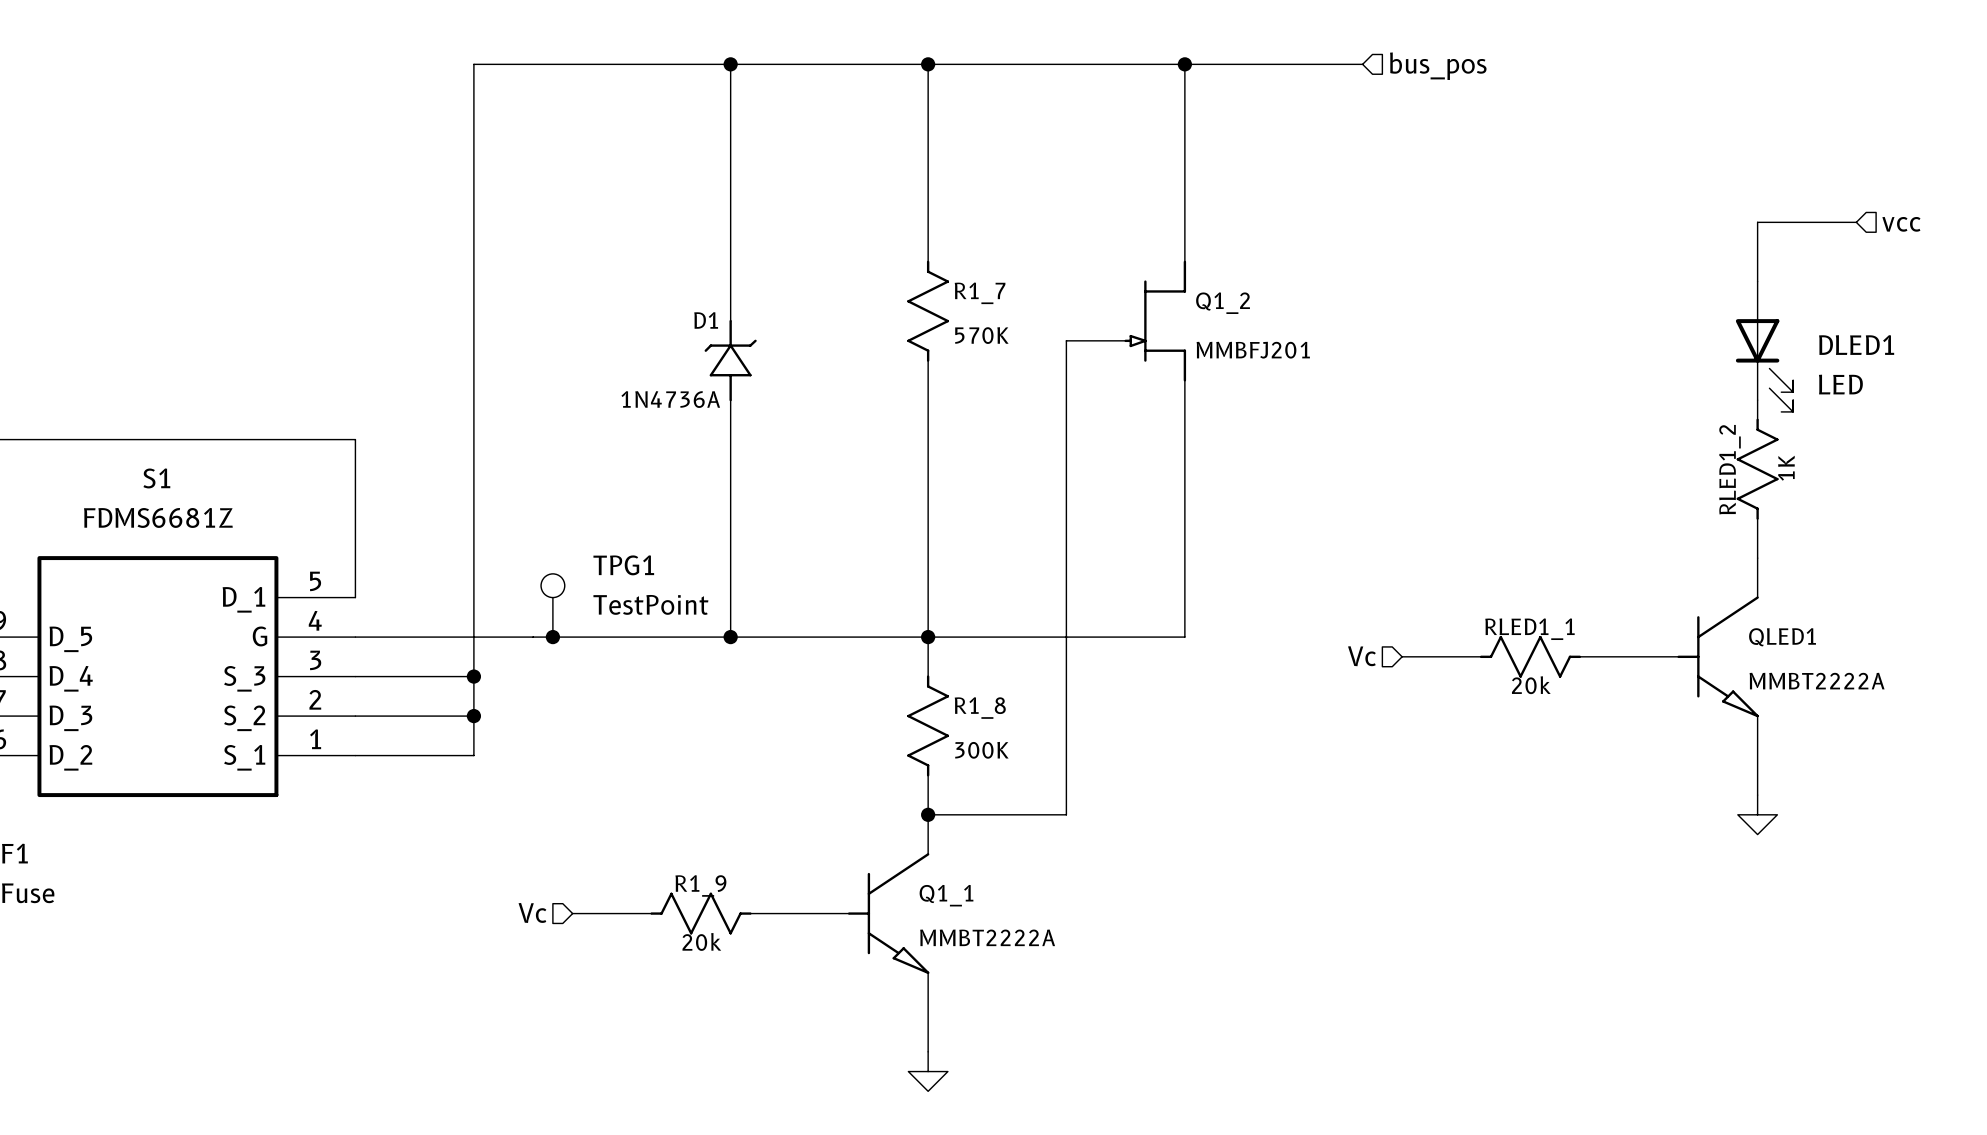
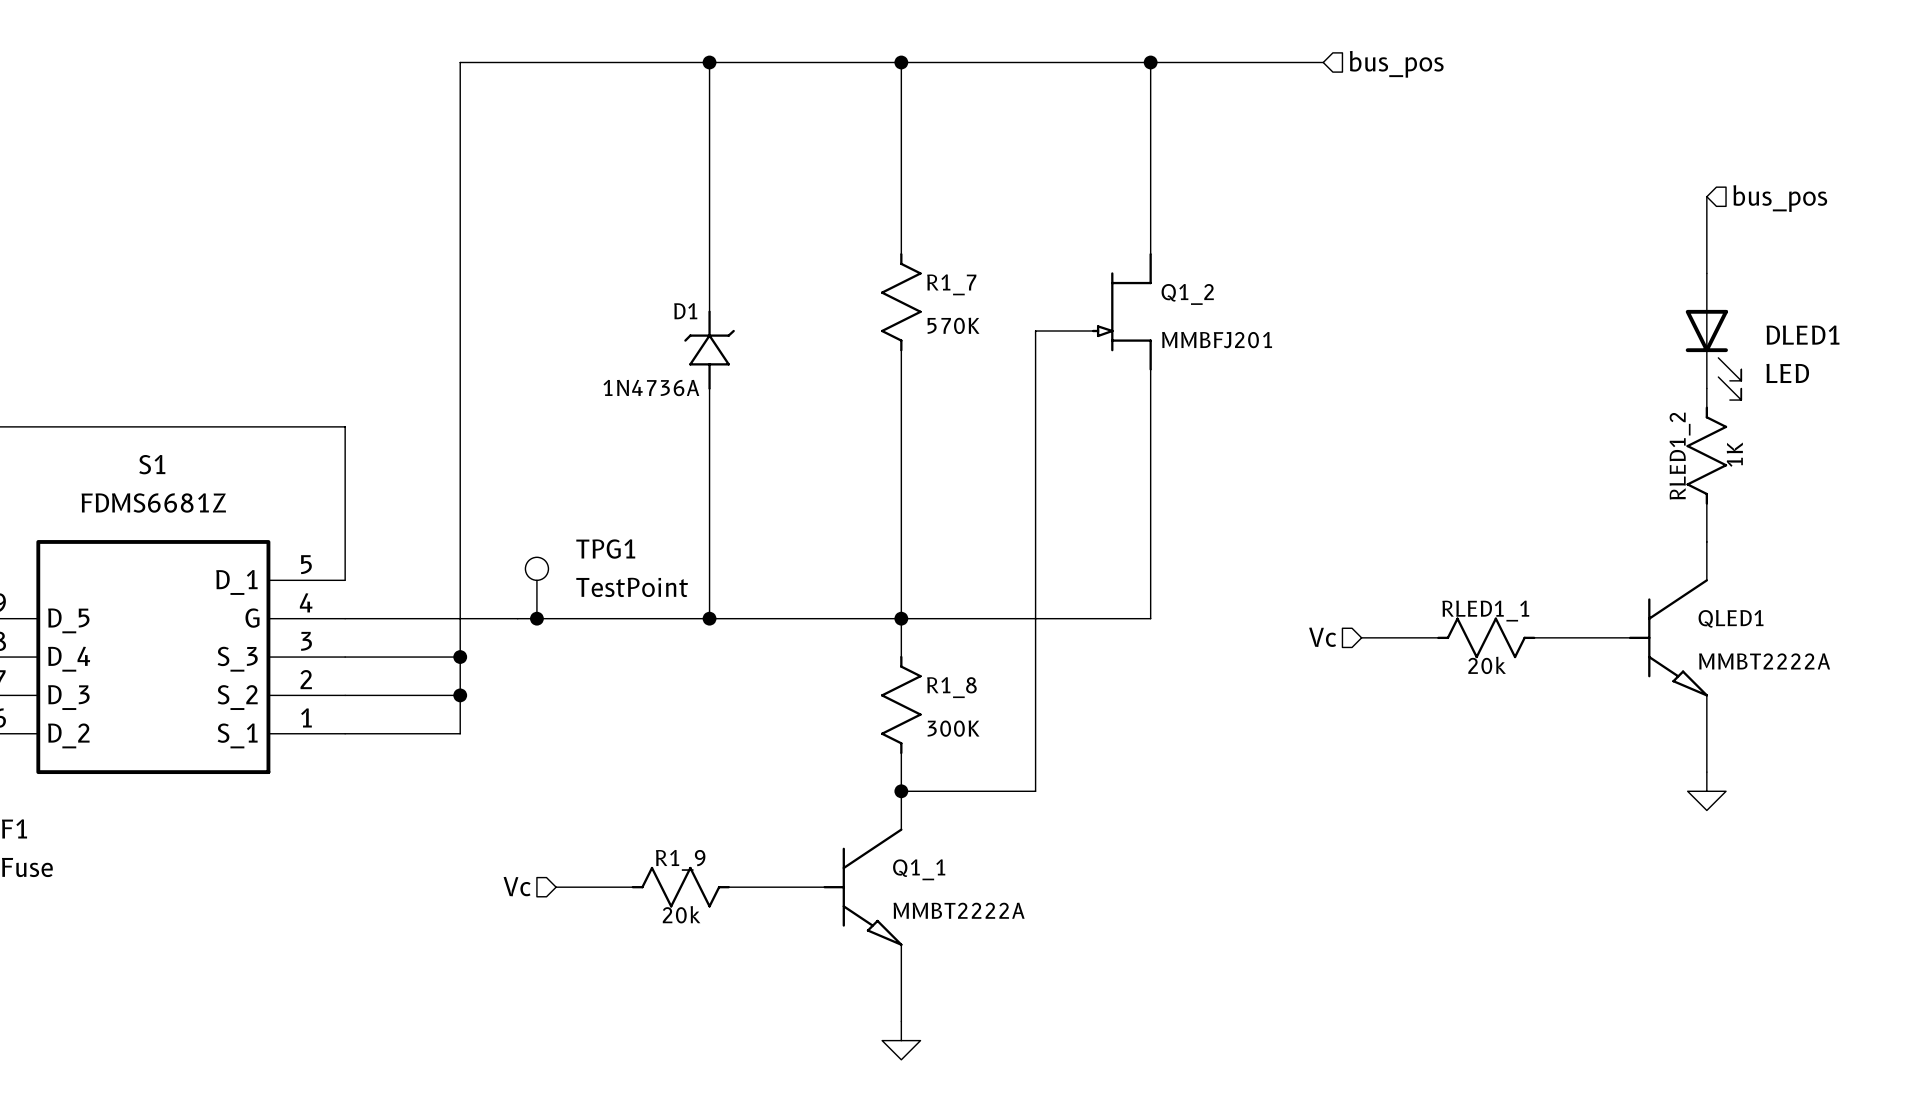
hierarchical label: none -> bus_pos (1780, 198)
wire: (1757, 222) (1856, 222) -> (1706, 215) (1706, 196)
hierarchical label: vcc (1901, 224) -> none

